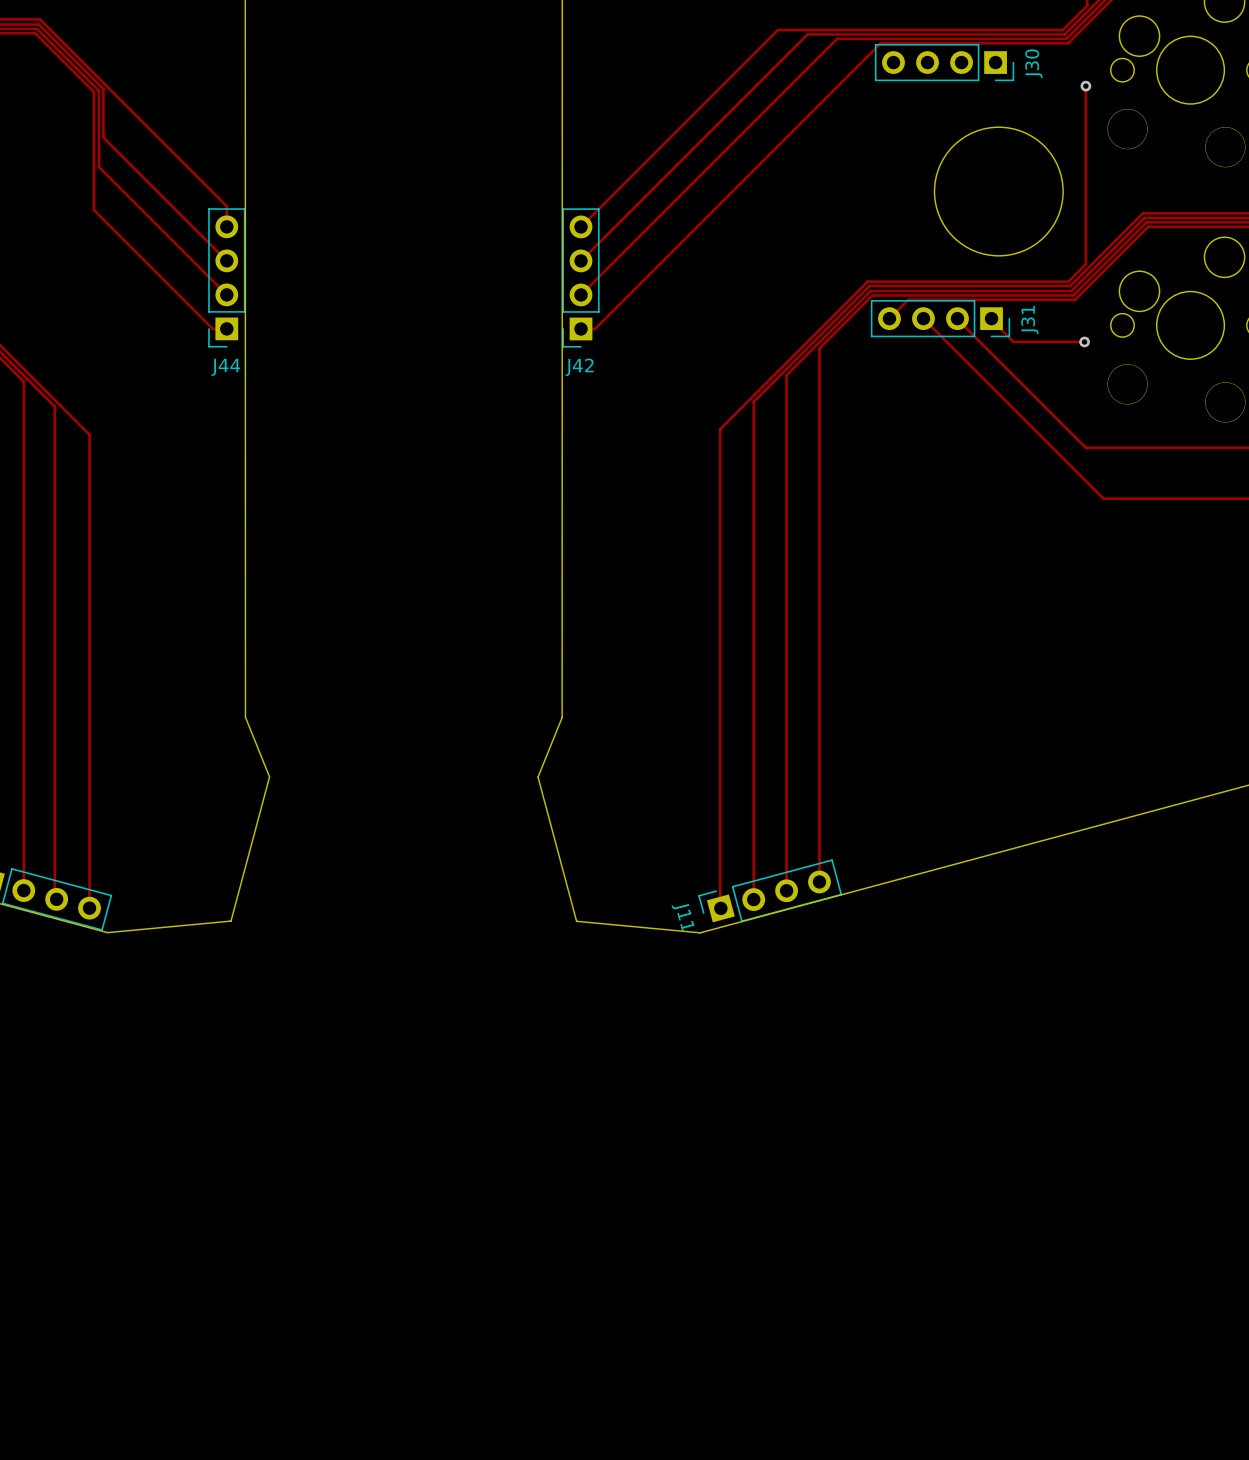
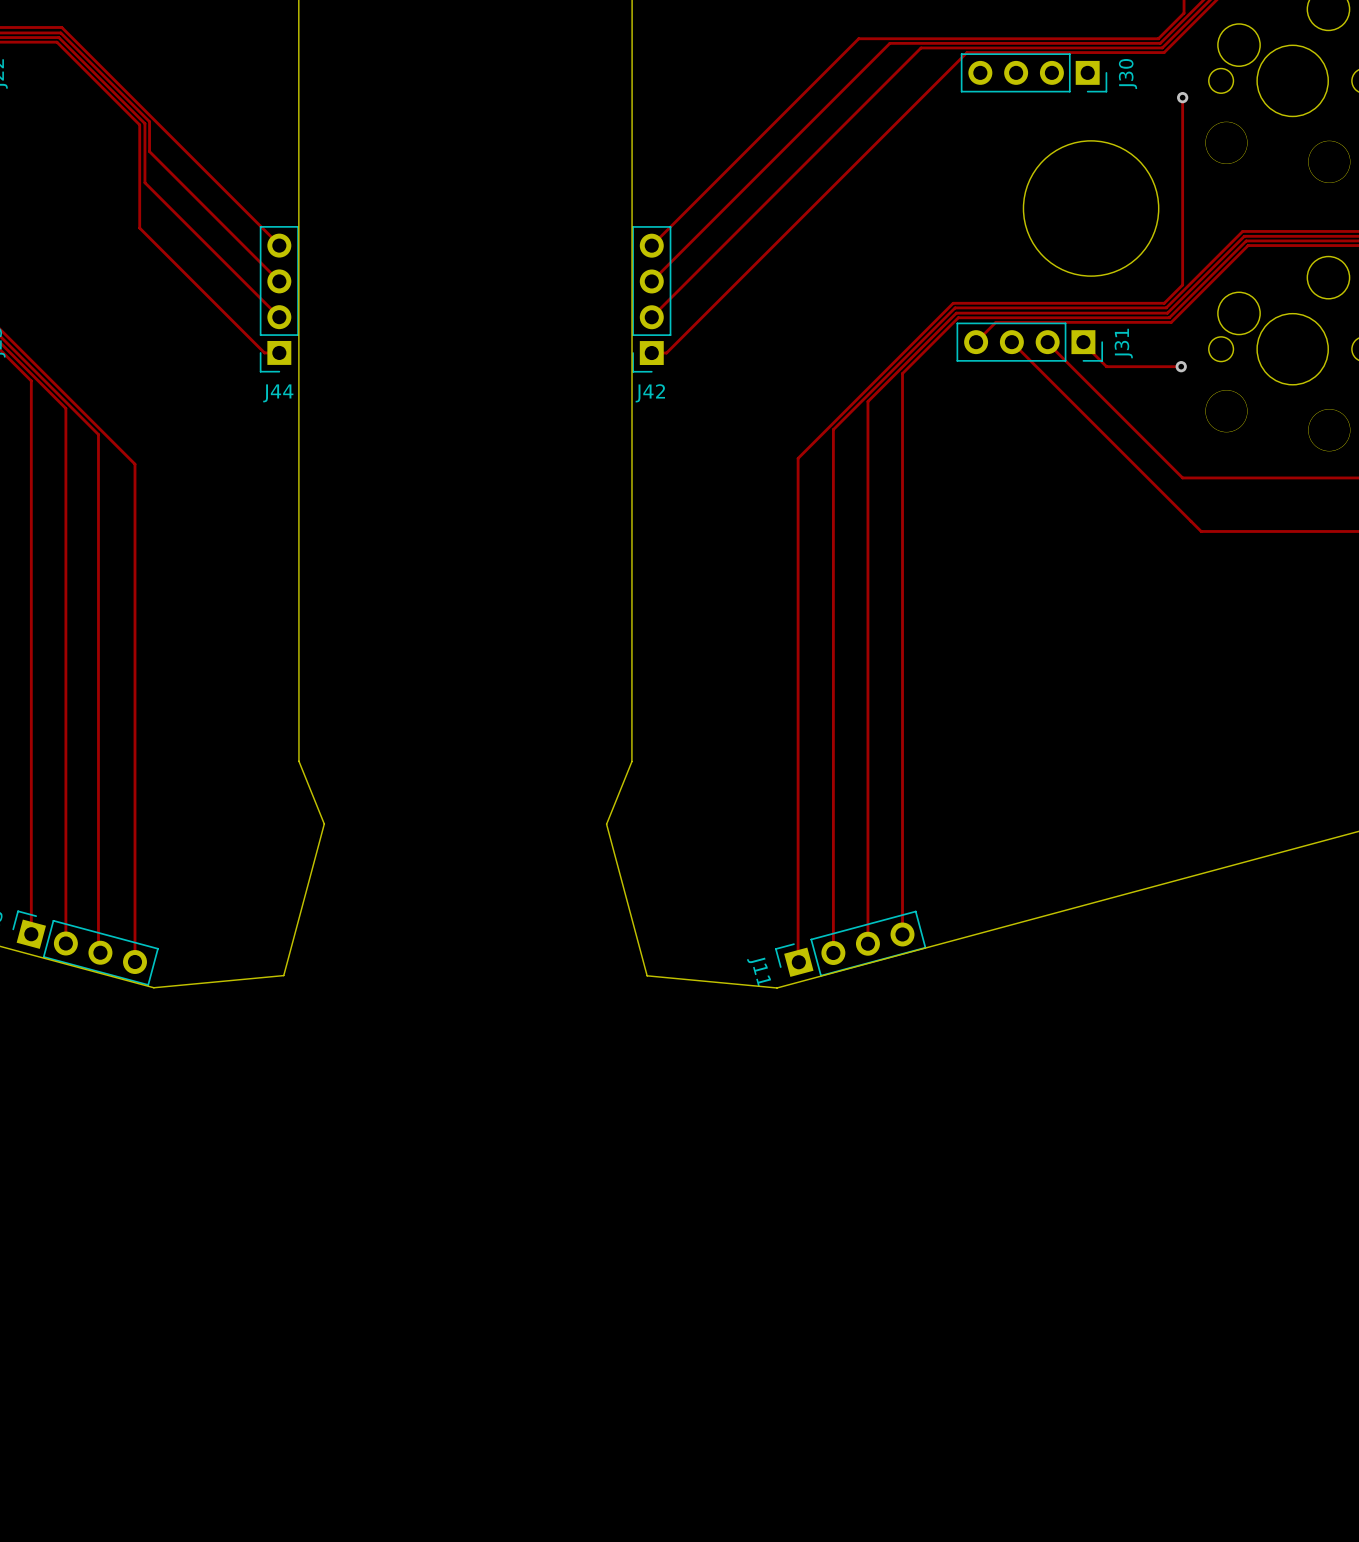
track: (19, 19) (39, 19) (226, 206) (226, 226) -> (61, 27) (279, 244)
track: (18, 24) (38, 24) (103, 89) (103, 109) -> (60, 32) (149, 121)
track: (17, 28) (37, 28) (99, 90) (99, 110) -> (58, 37) (144, 123)
track: (15, 33) (35, 33) (94, 92) (94, 112) -> (56, 42) (139, 124)

